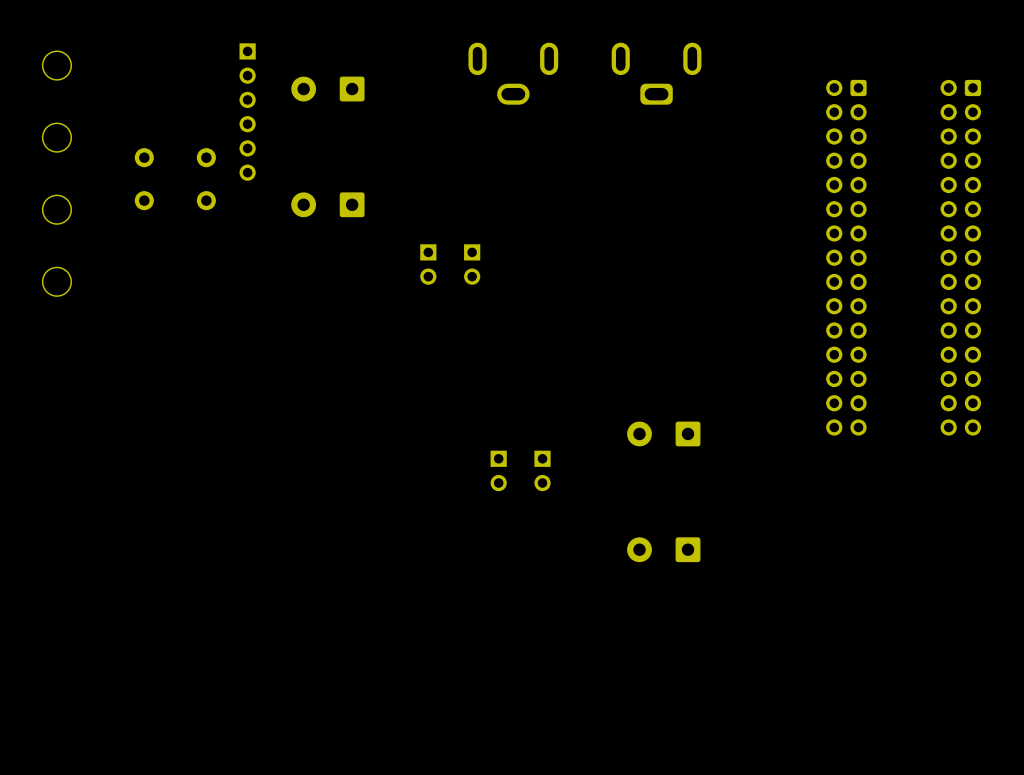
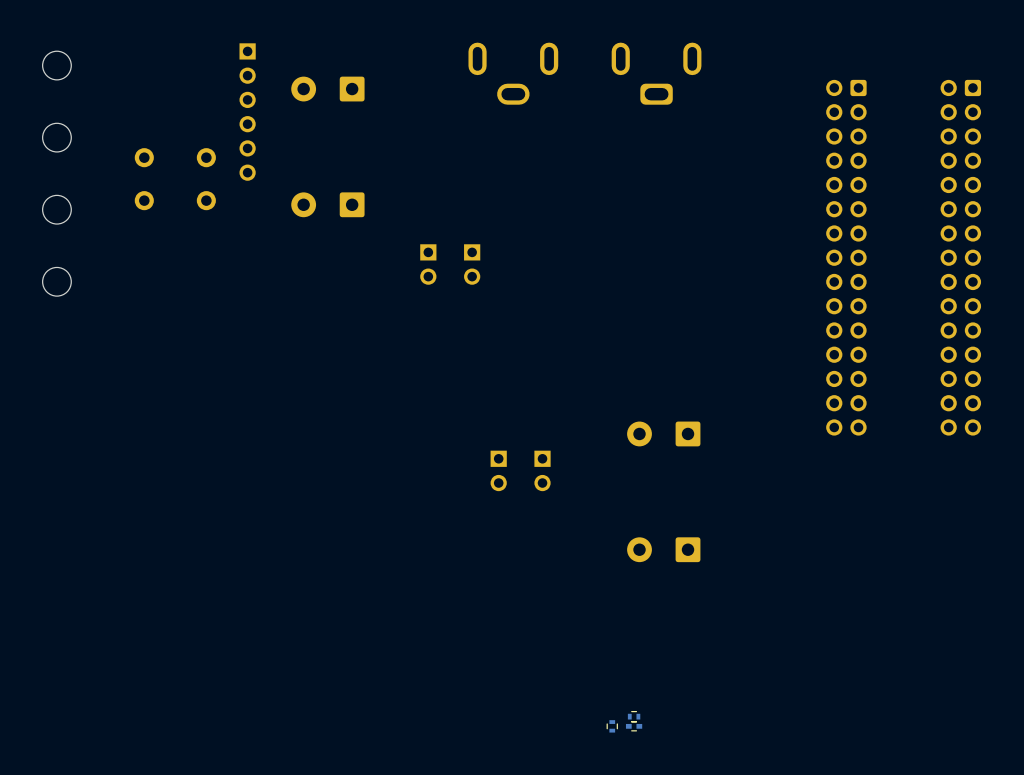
part: none -> (634, 716)
part: none -> (612, 726)
part: none -> (634, 726)

